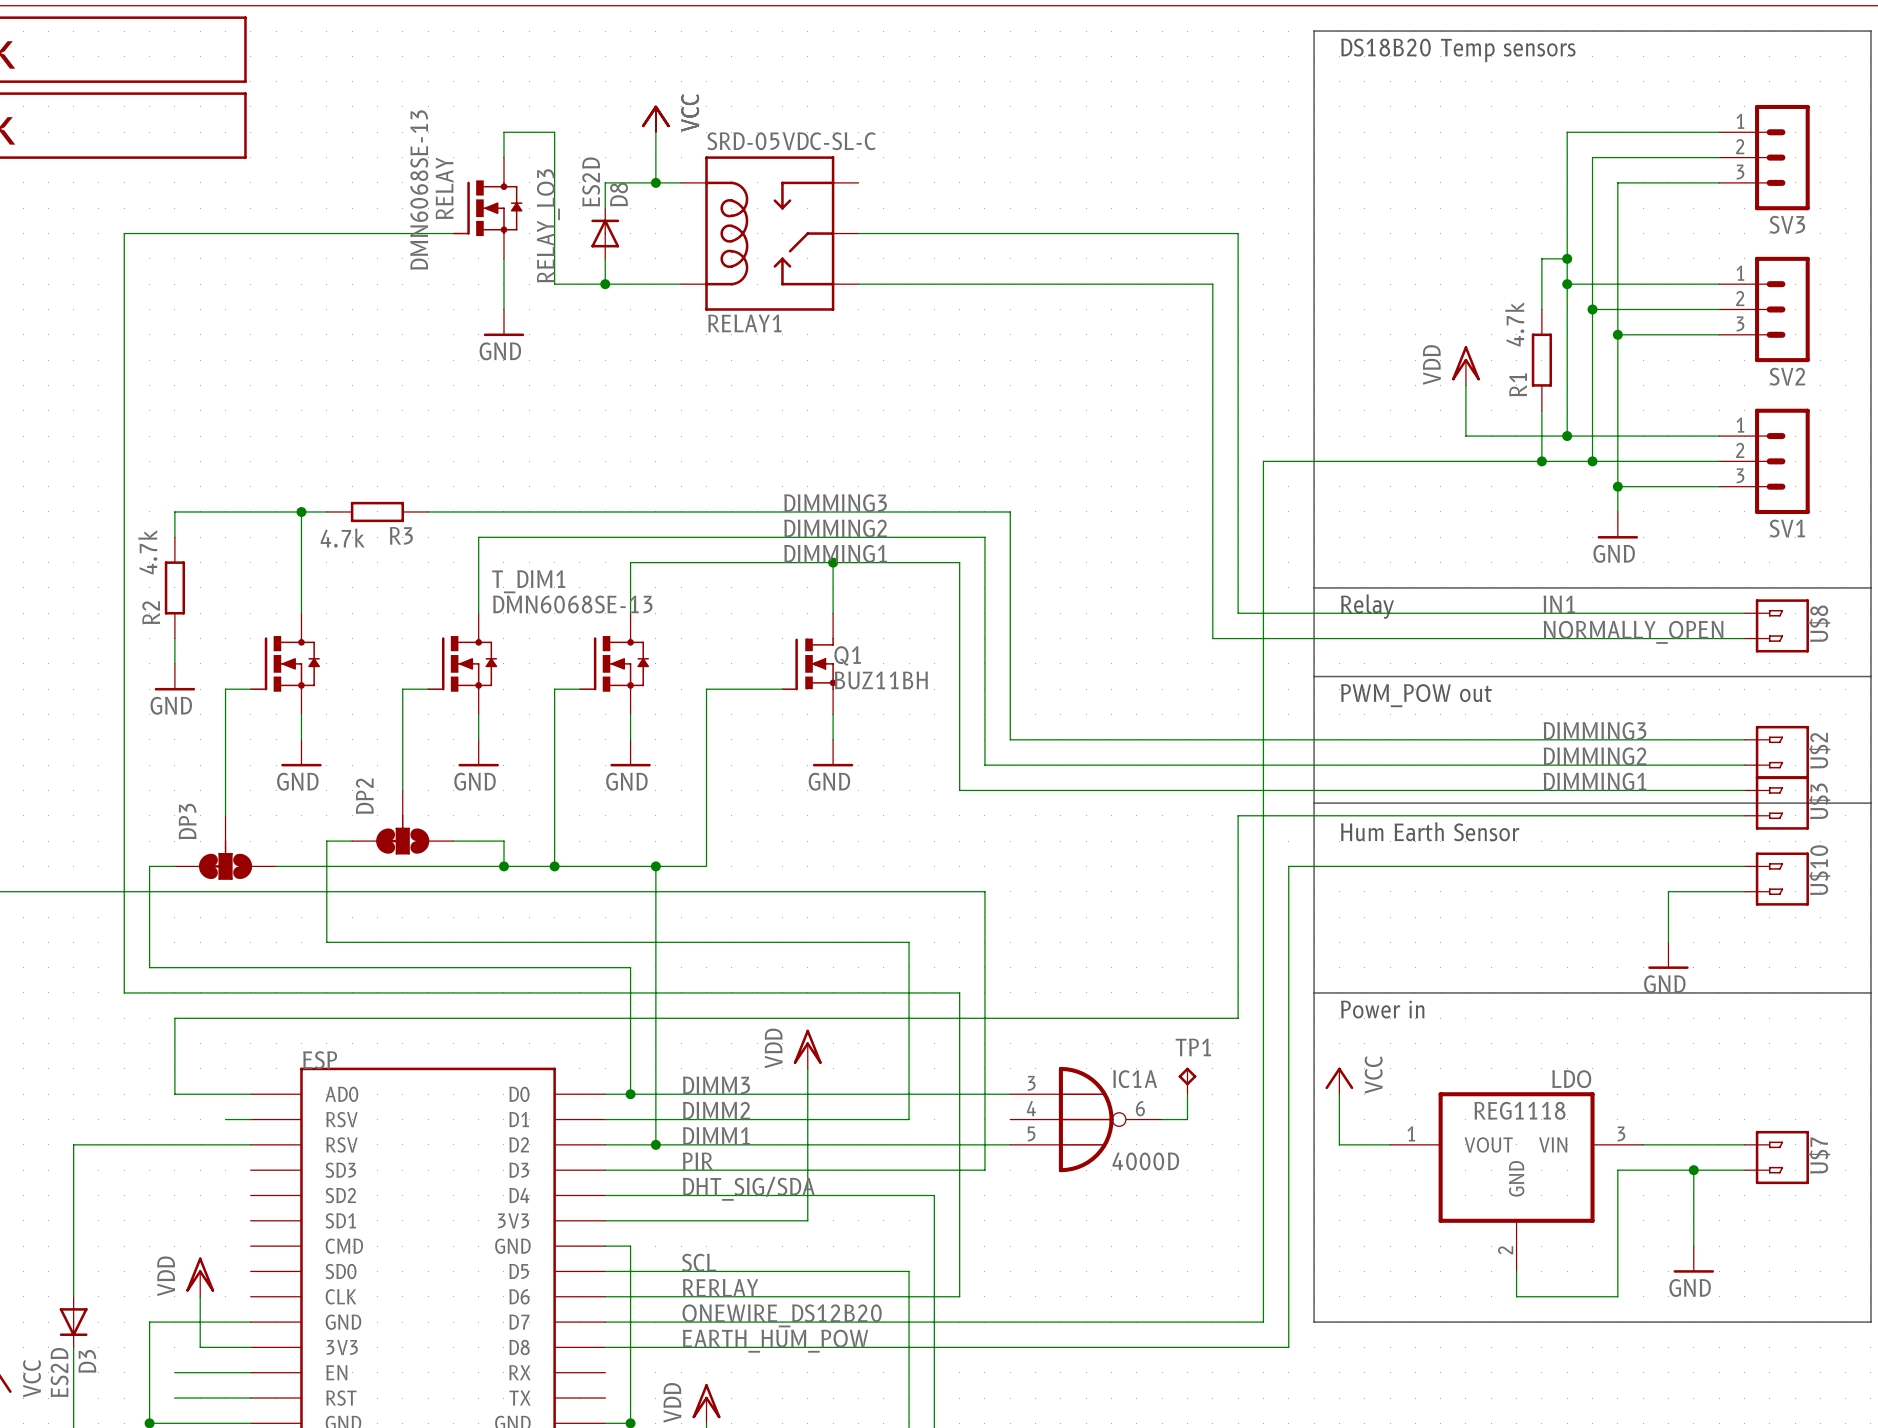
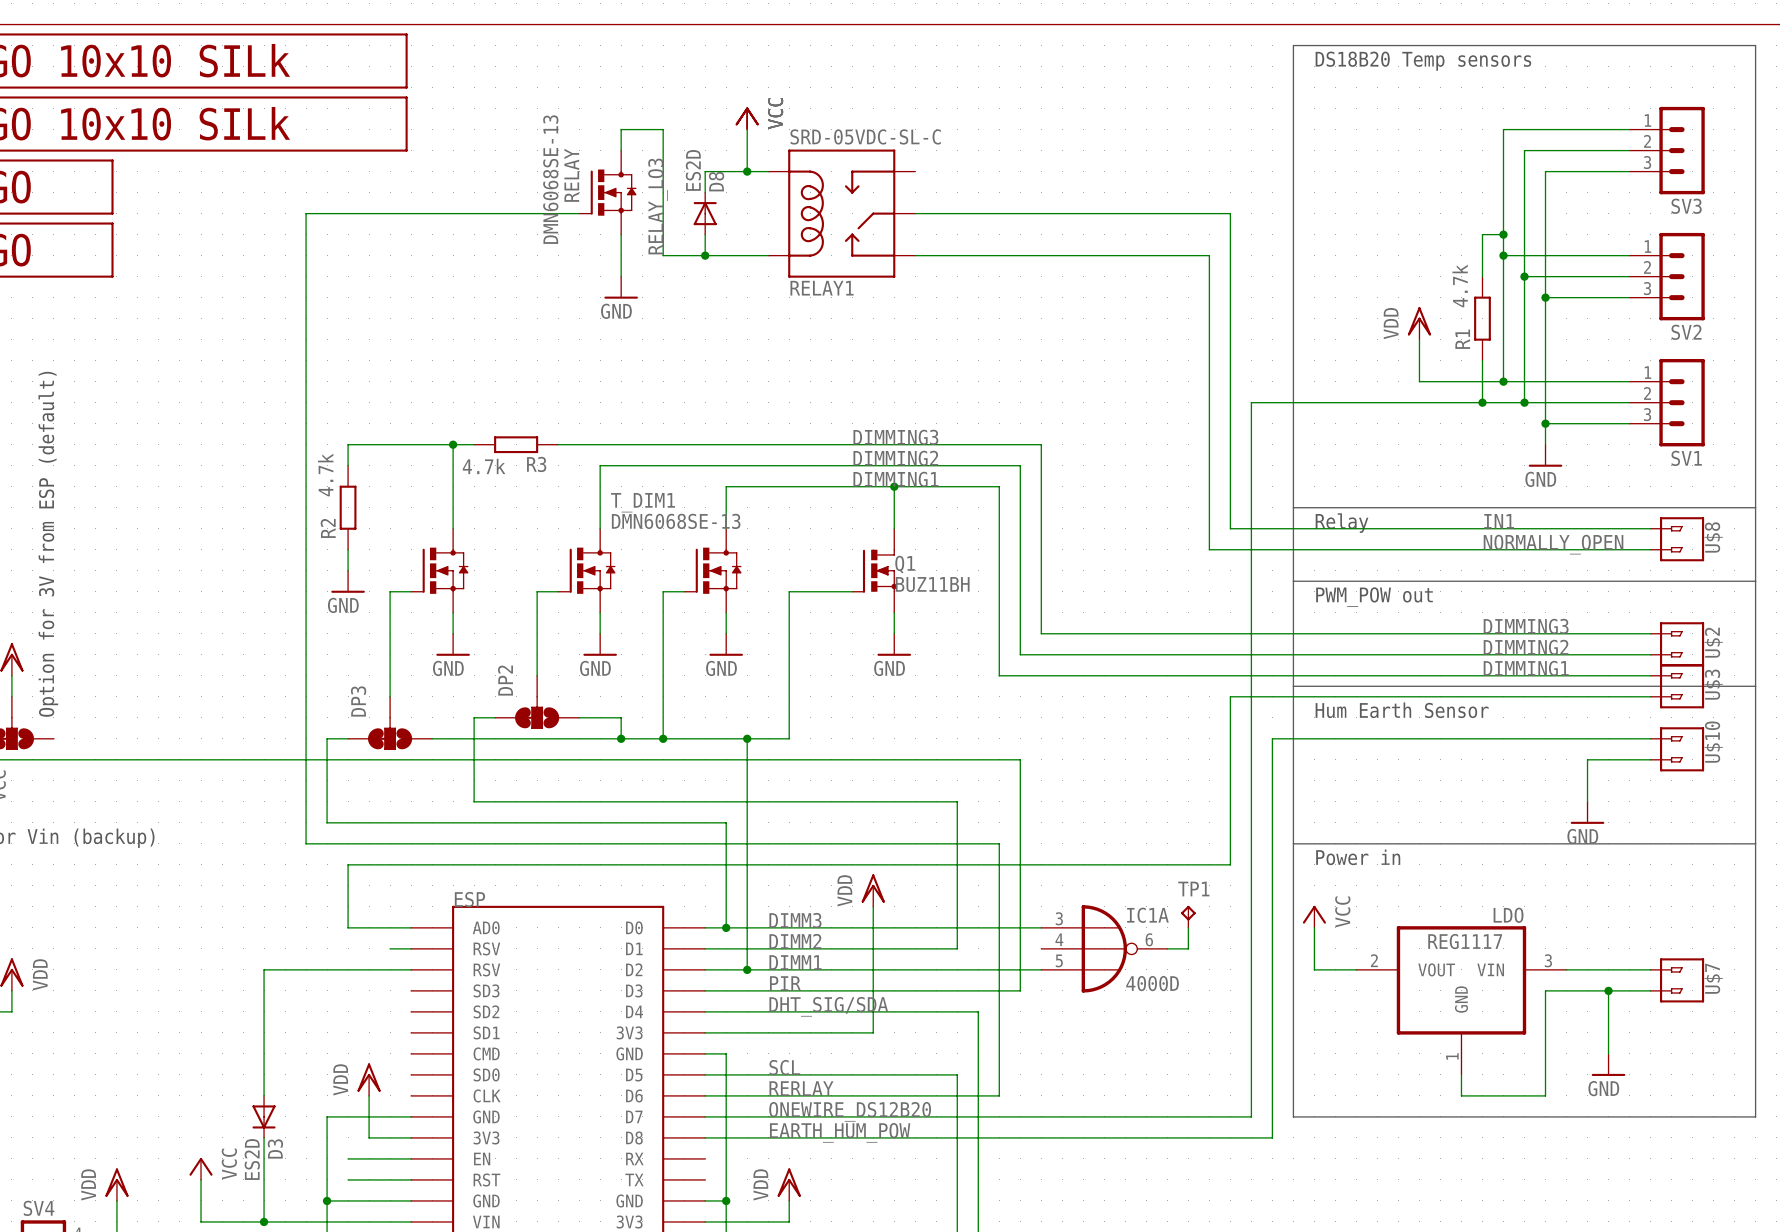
LDO value: REG1118 (1519, 1110) -> REG1117 (1465, 941)
LDO pin number: 1 (1411, 1133) -> 2 (1374, 960)
LDO pin number: 2 (1505, 1250) -> 1 (1452, 1056)

